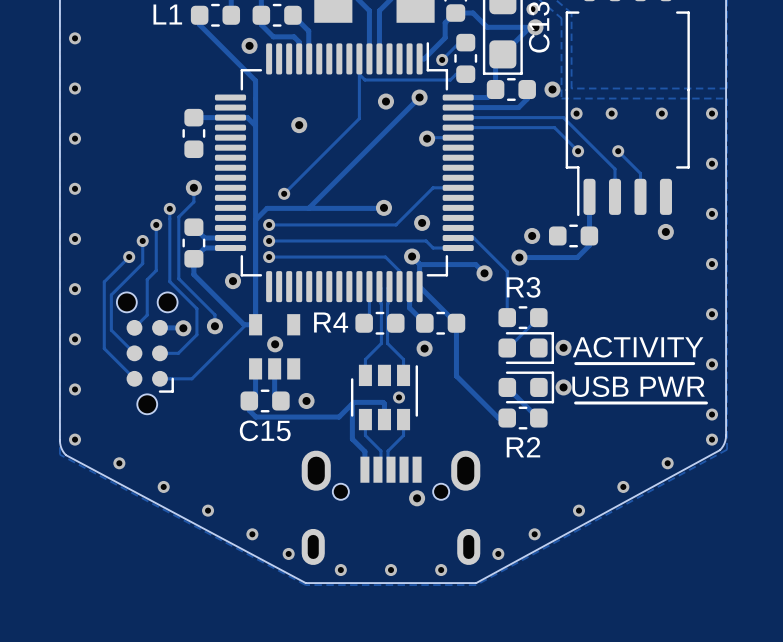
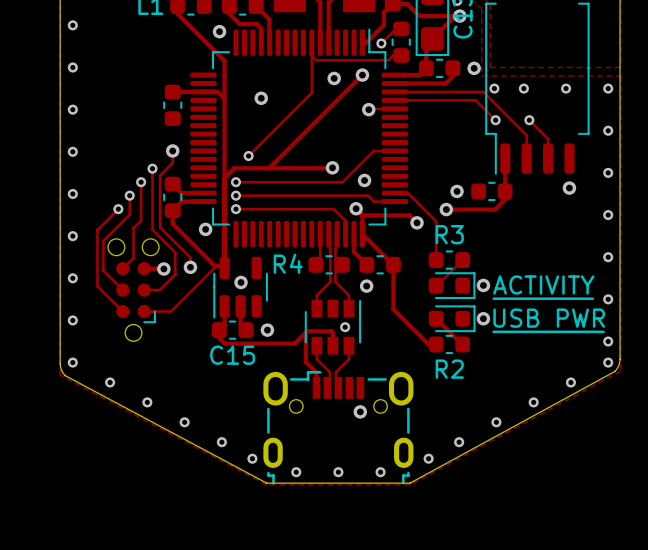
part footprint: [249, 314, 301, 380] -> [213, 256, 268, 319]
part footprint: [301, 450, 481, 566] -> [263, 371, 414, 485]

